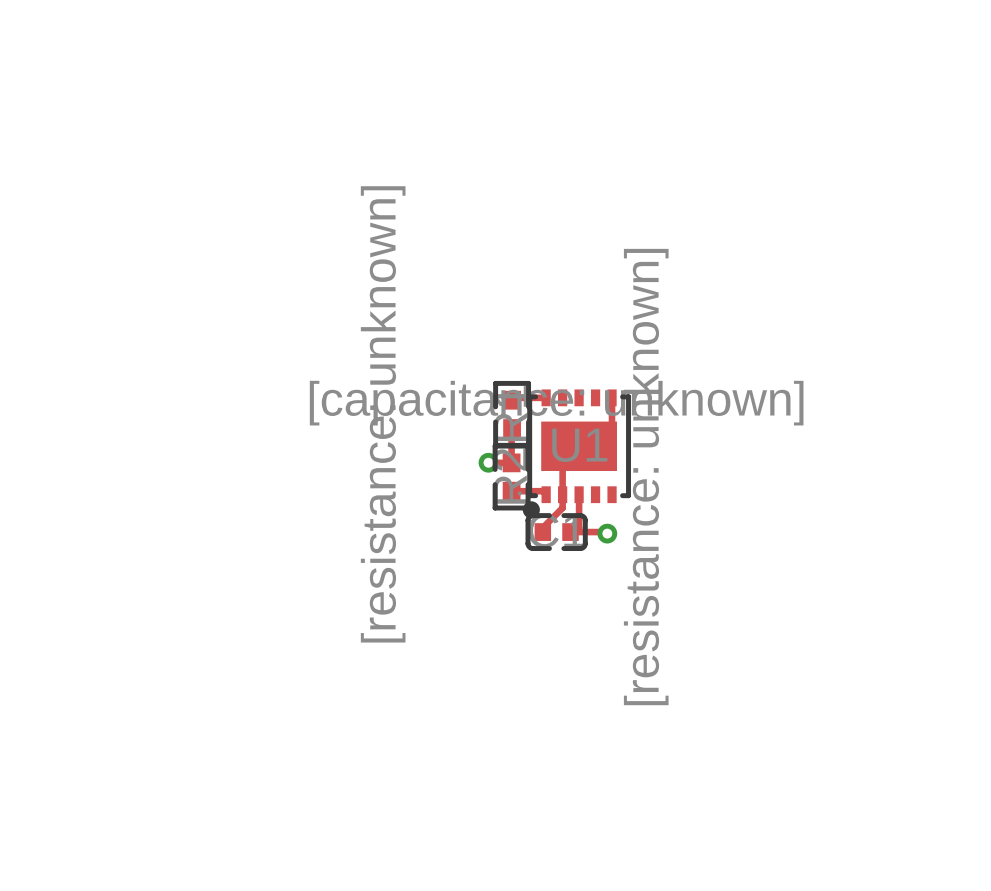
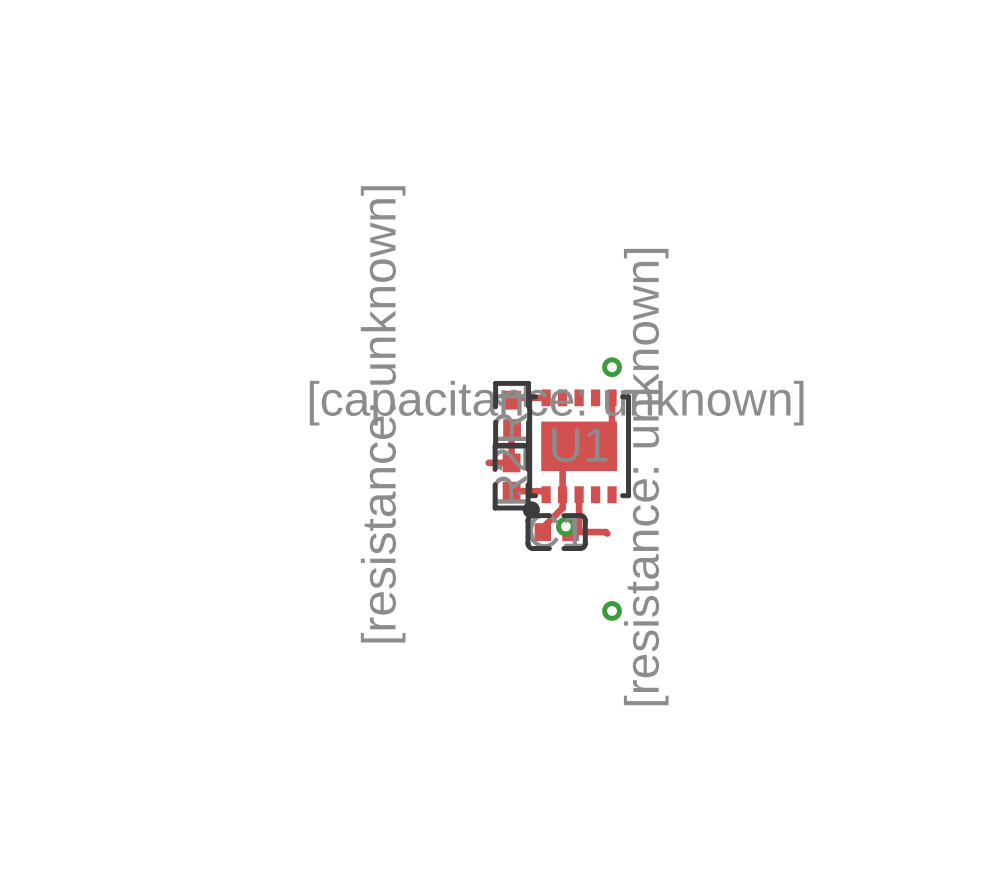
via: none -> (612, 367)
via: (488, 462) -> none
via: none -> (565, 526)
via: (607, 533) -> none
via: none -> (612, 610)

